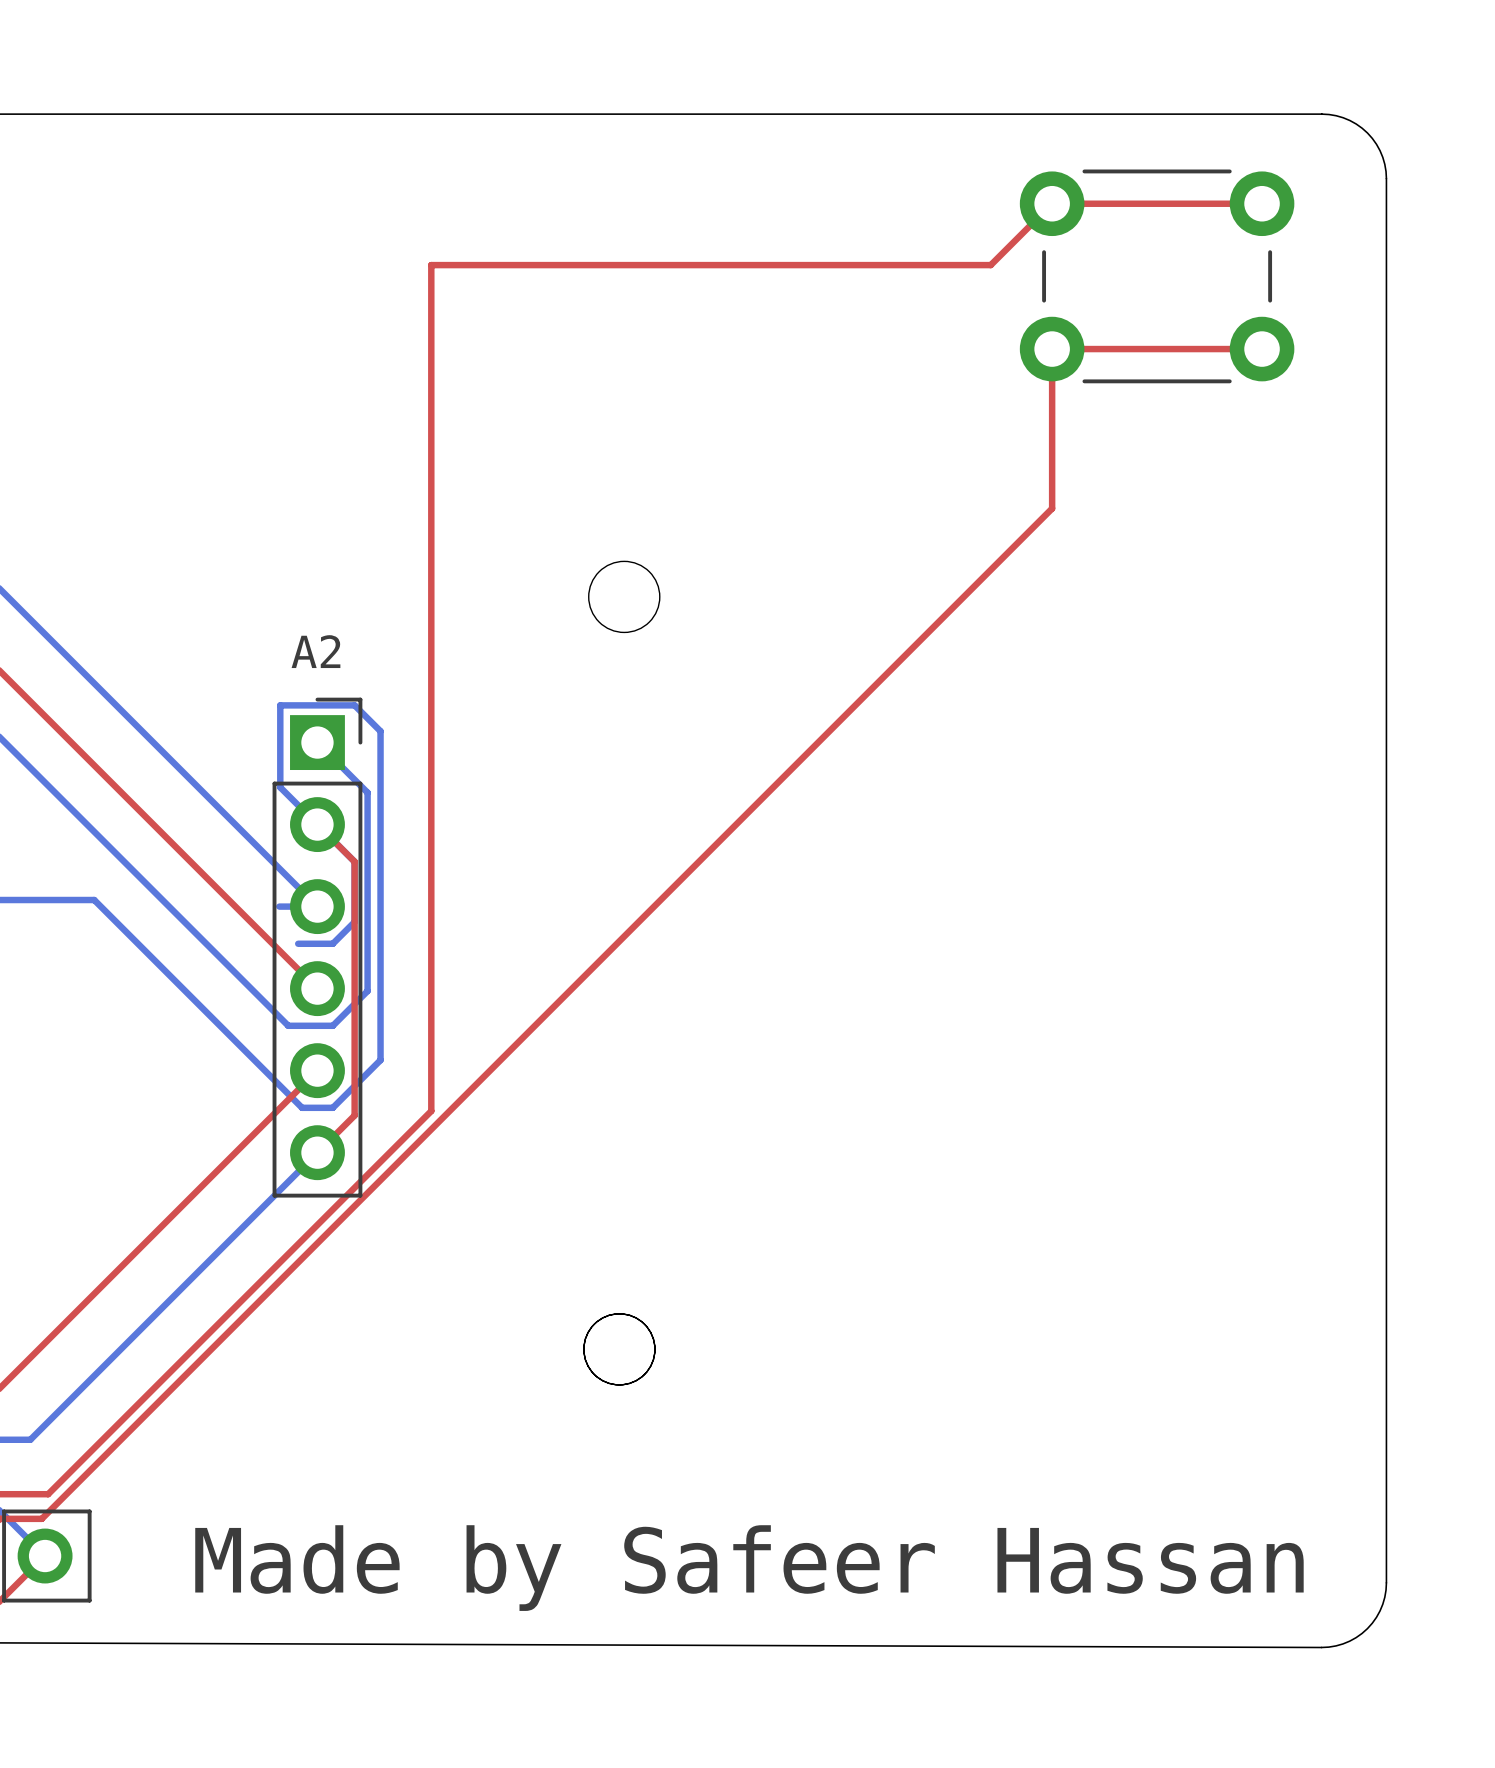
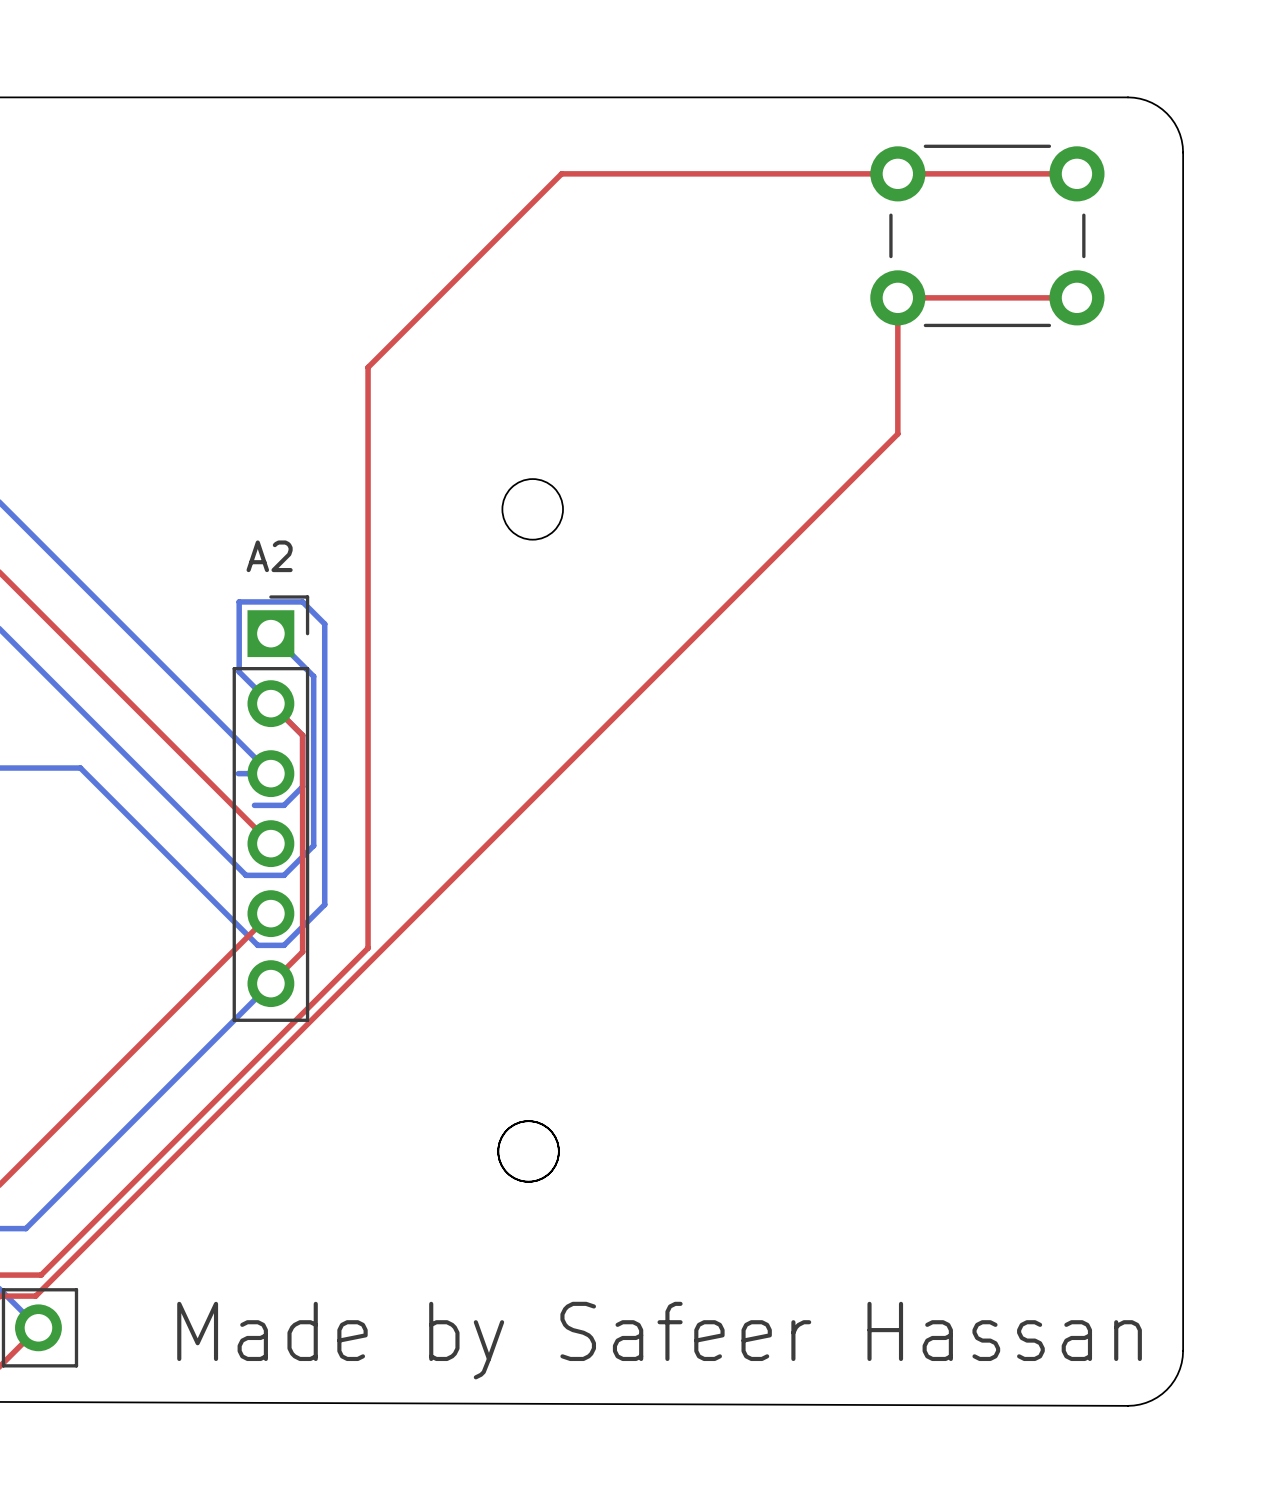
top track: (1052, 203) (990, 265) (431, 265) (431, 430) -> (897, 173) (561, 173) (368, 367)

